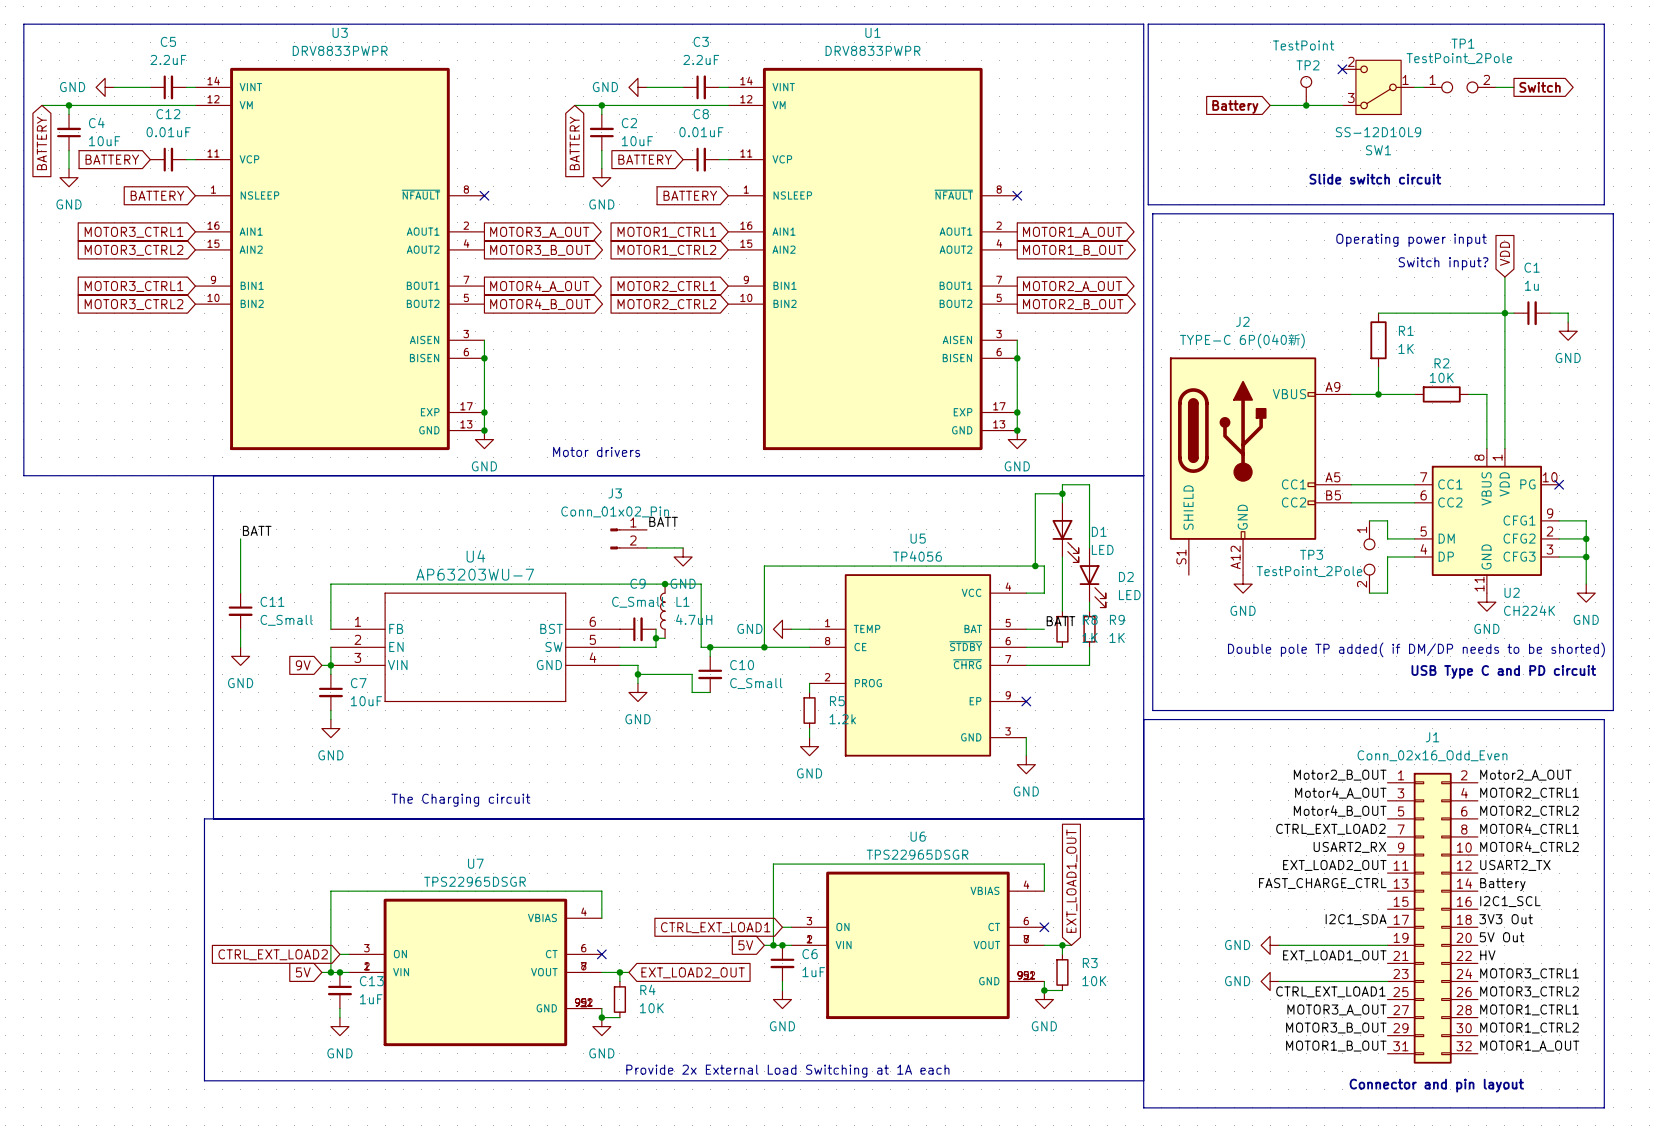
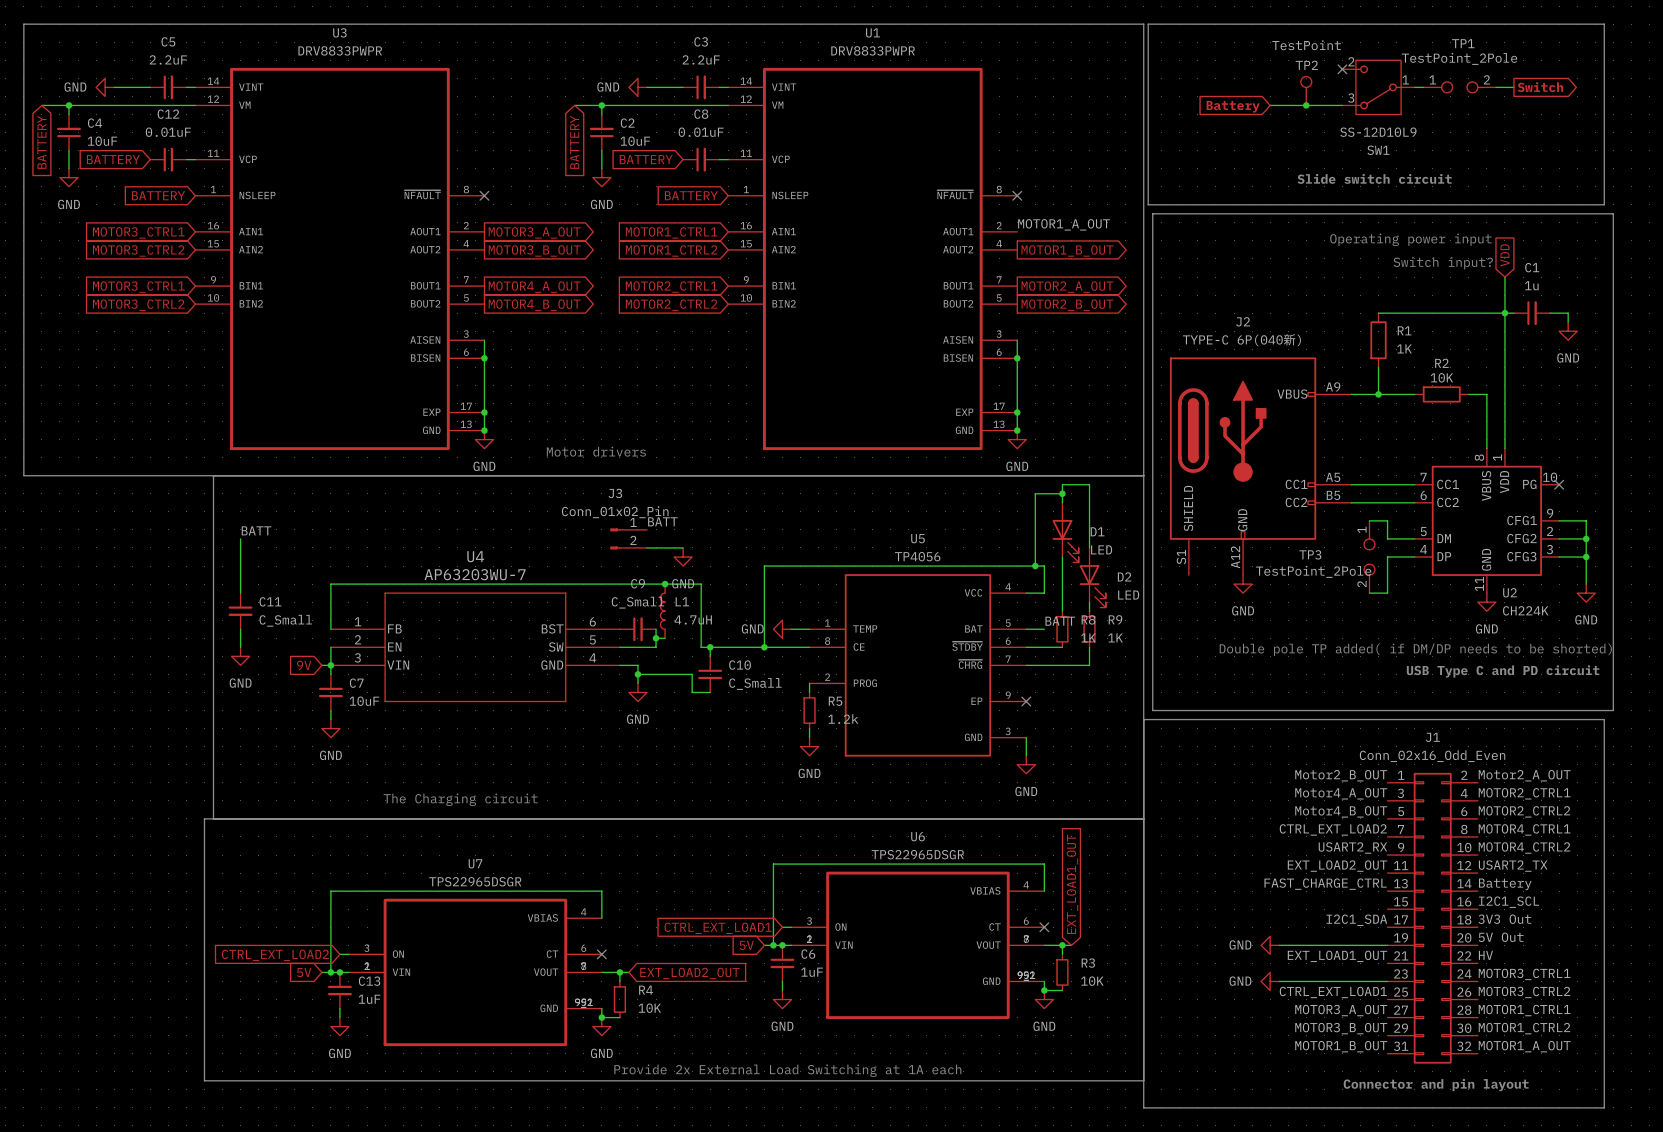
label: none -> MOTOR1_A_OUT (1064, 224)
global label: MOTOR1_A_OUT (1072, 232) -> none

